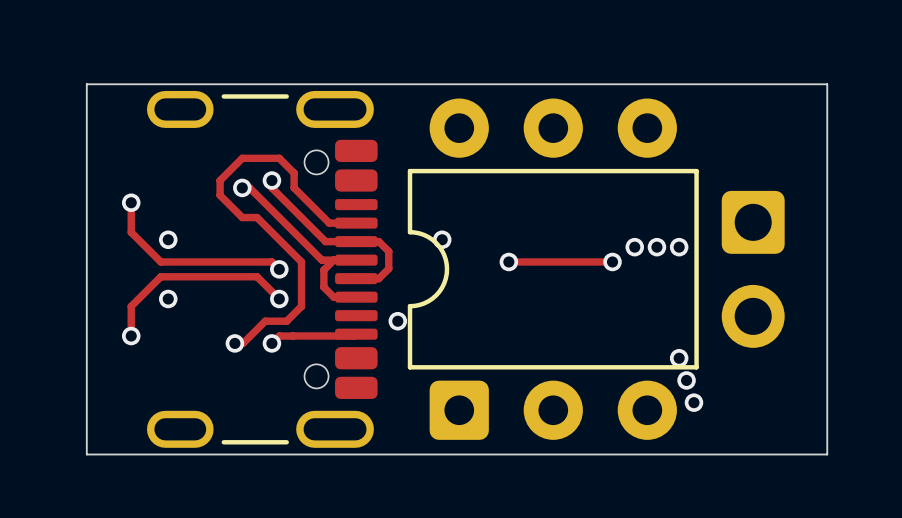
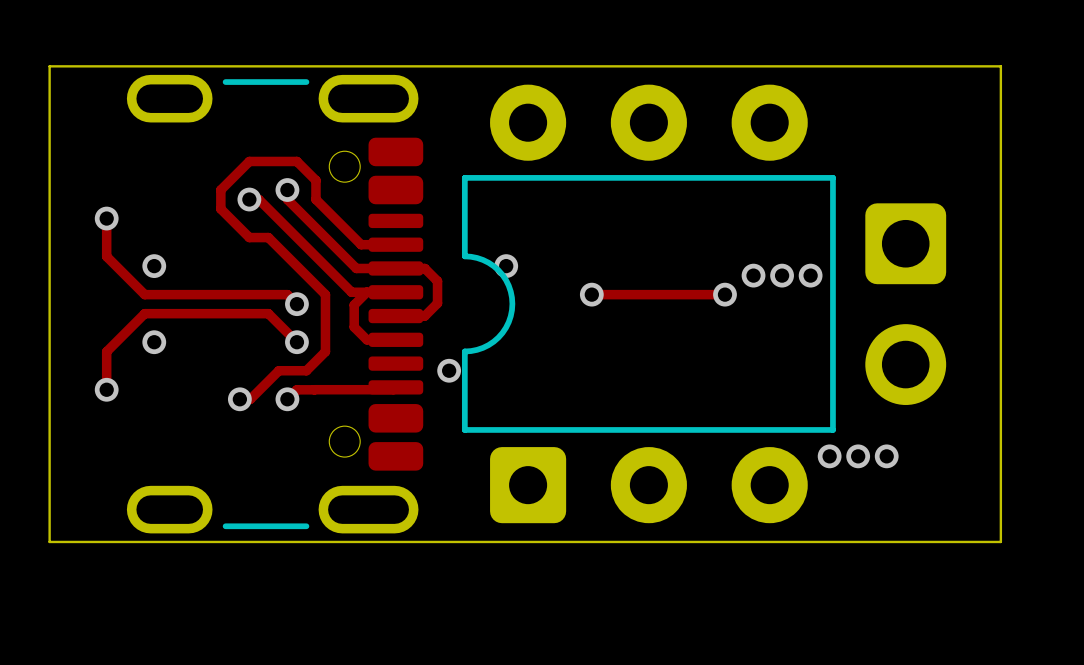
via: (679, 358) -> none
via: (686, 380) -> none
via: none -> (829, 456)
via: none -> (858, 456)
via: none -> (886, 456)
via: (693, 402) -> none

